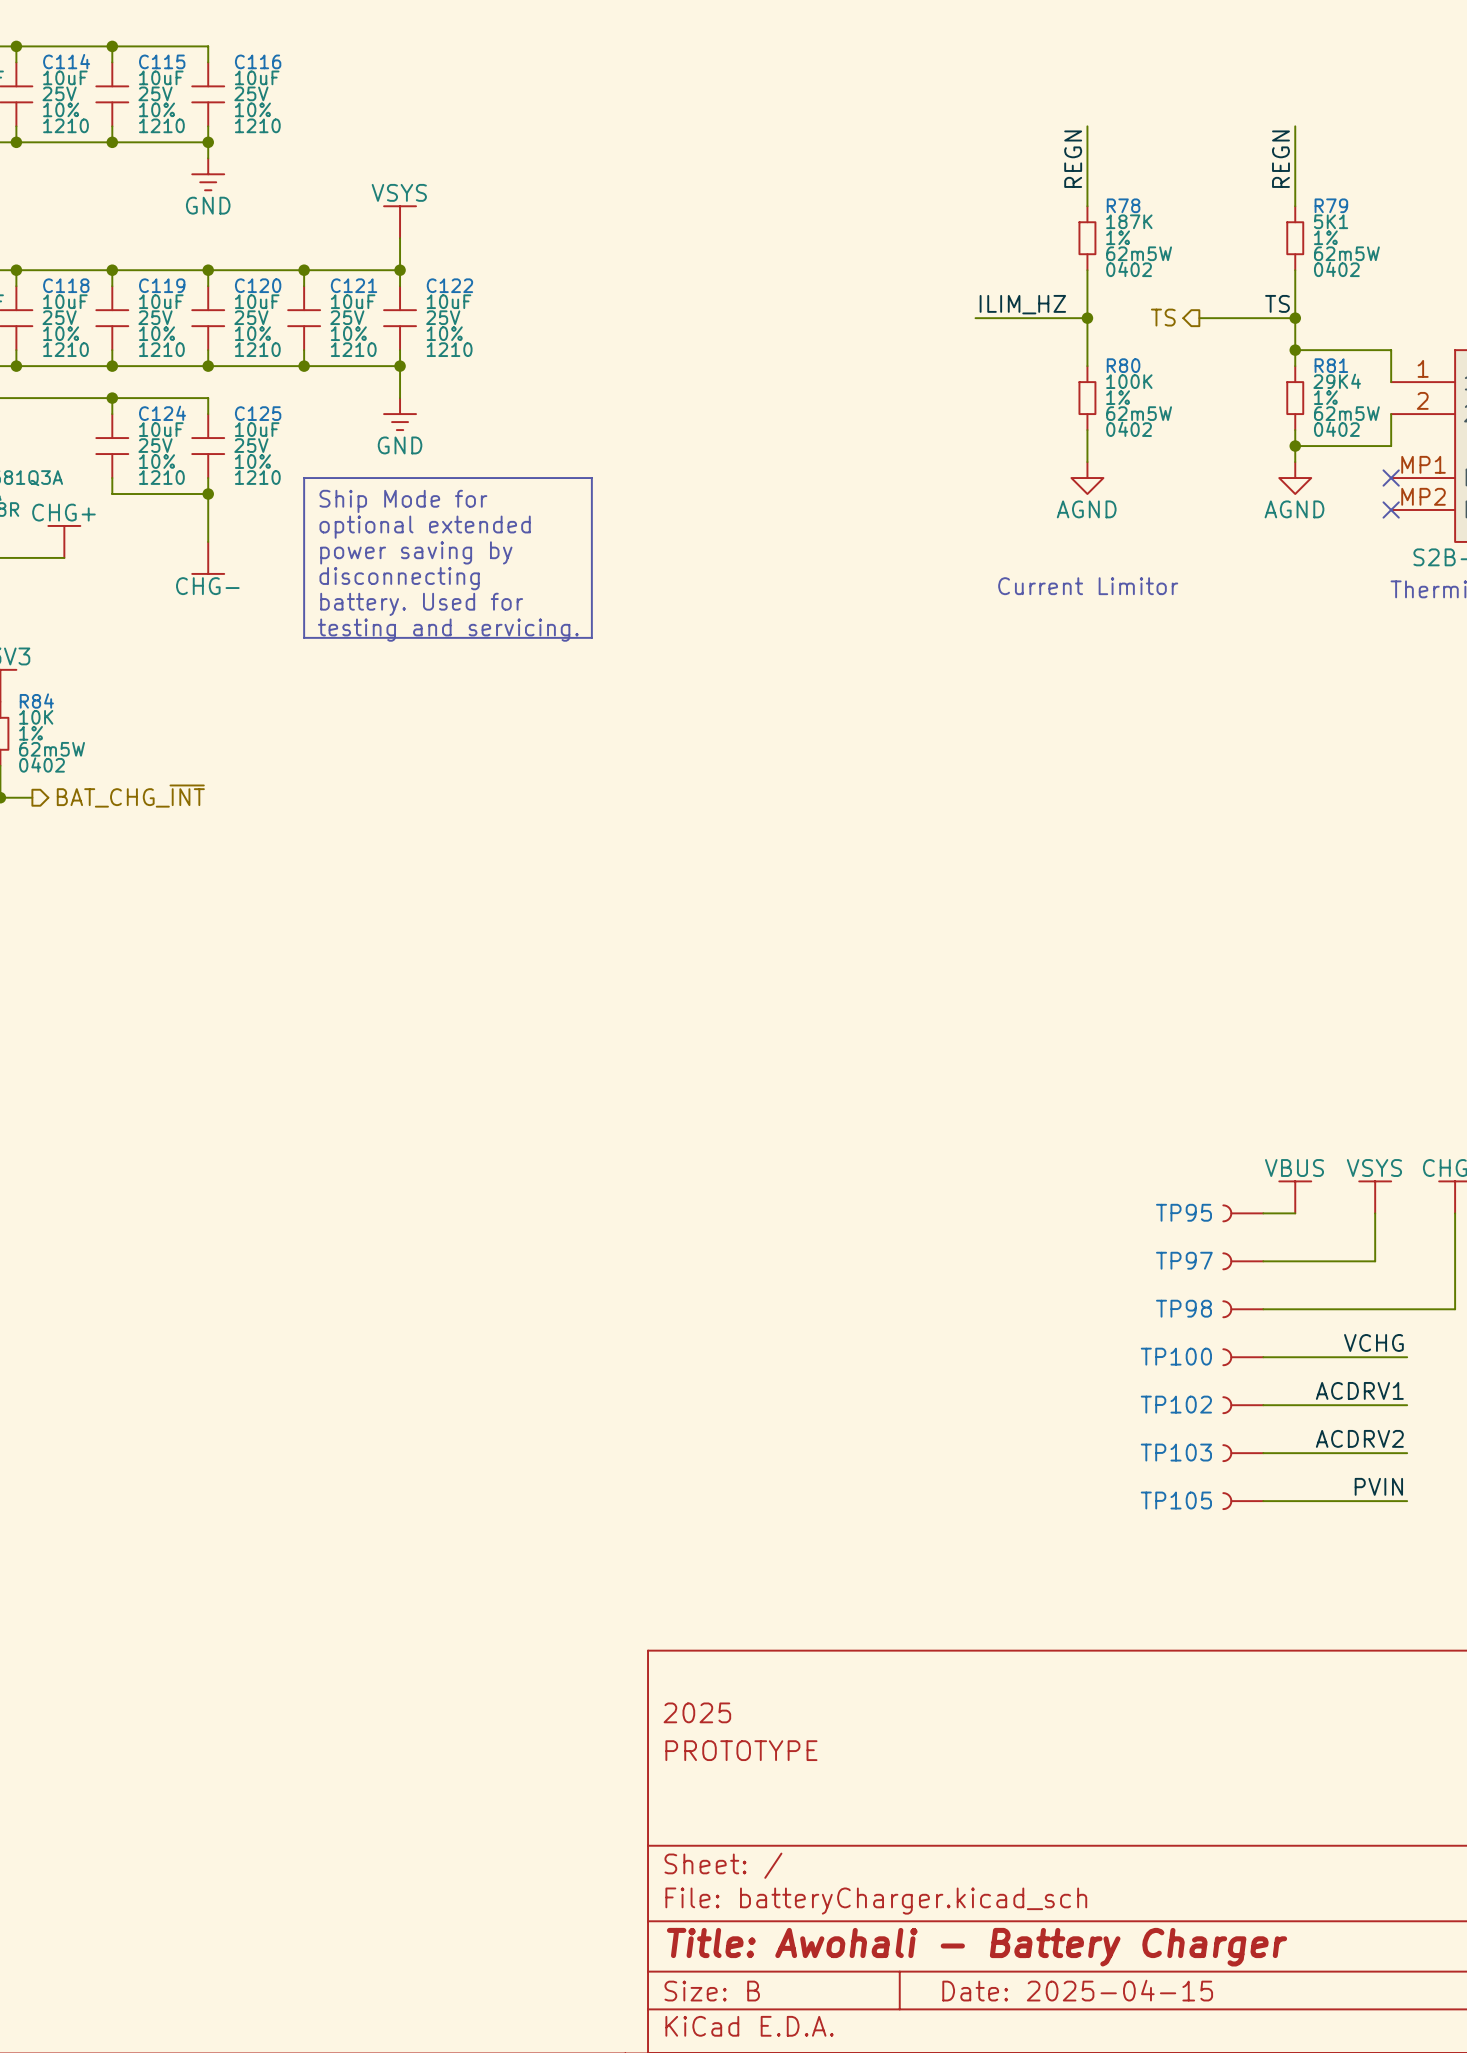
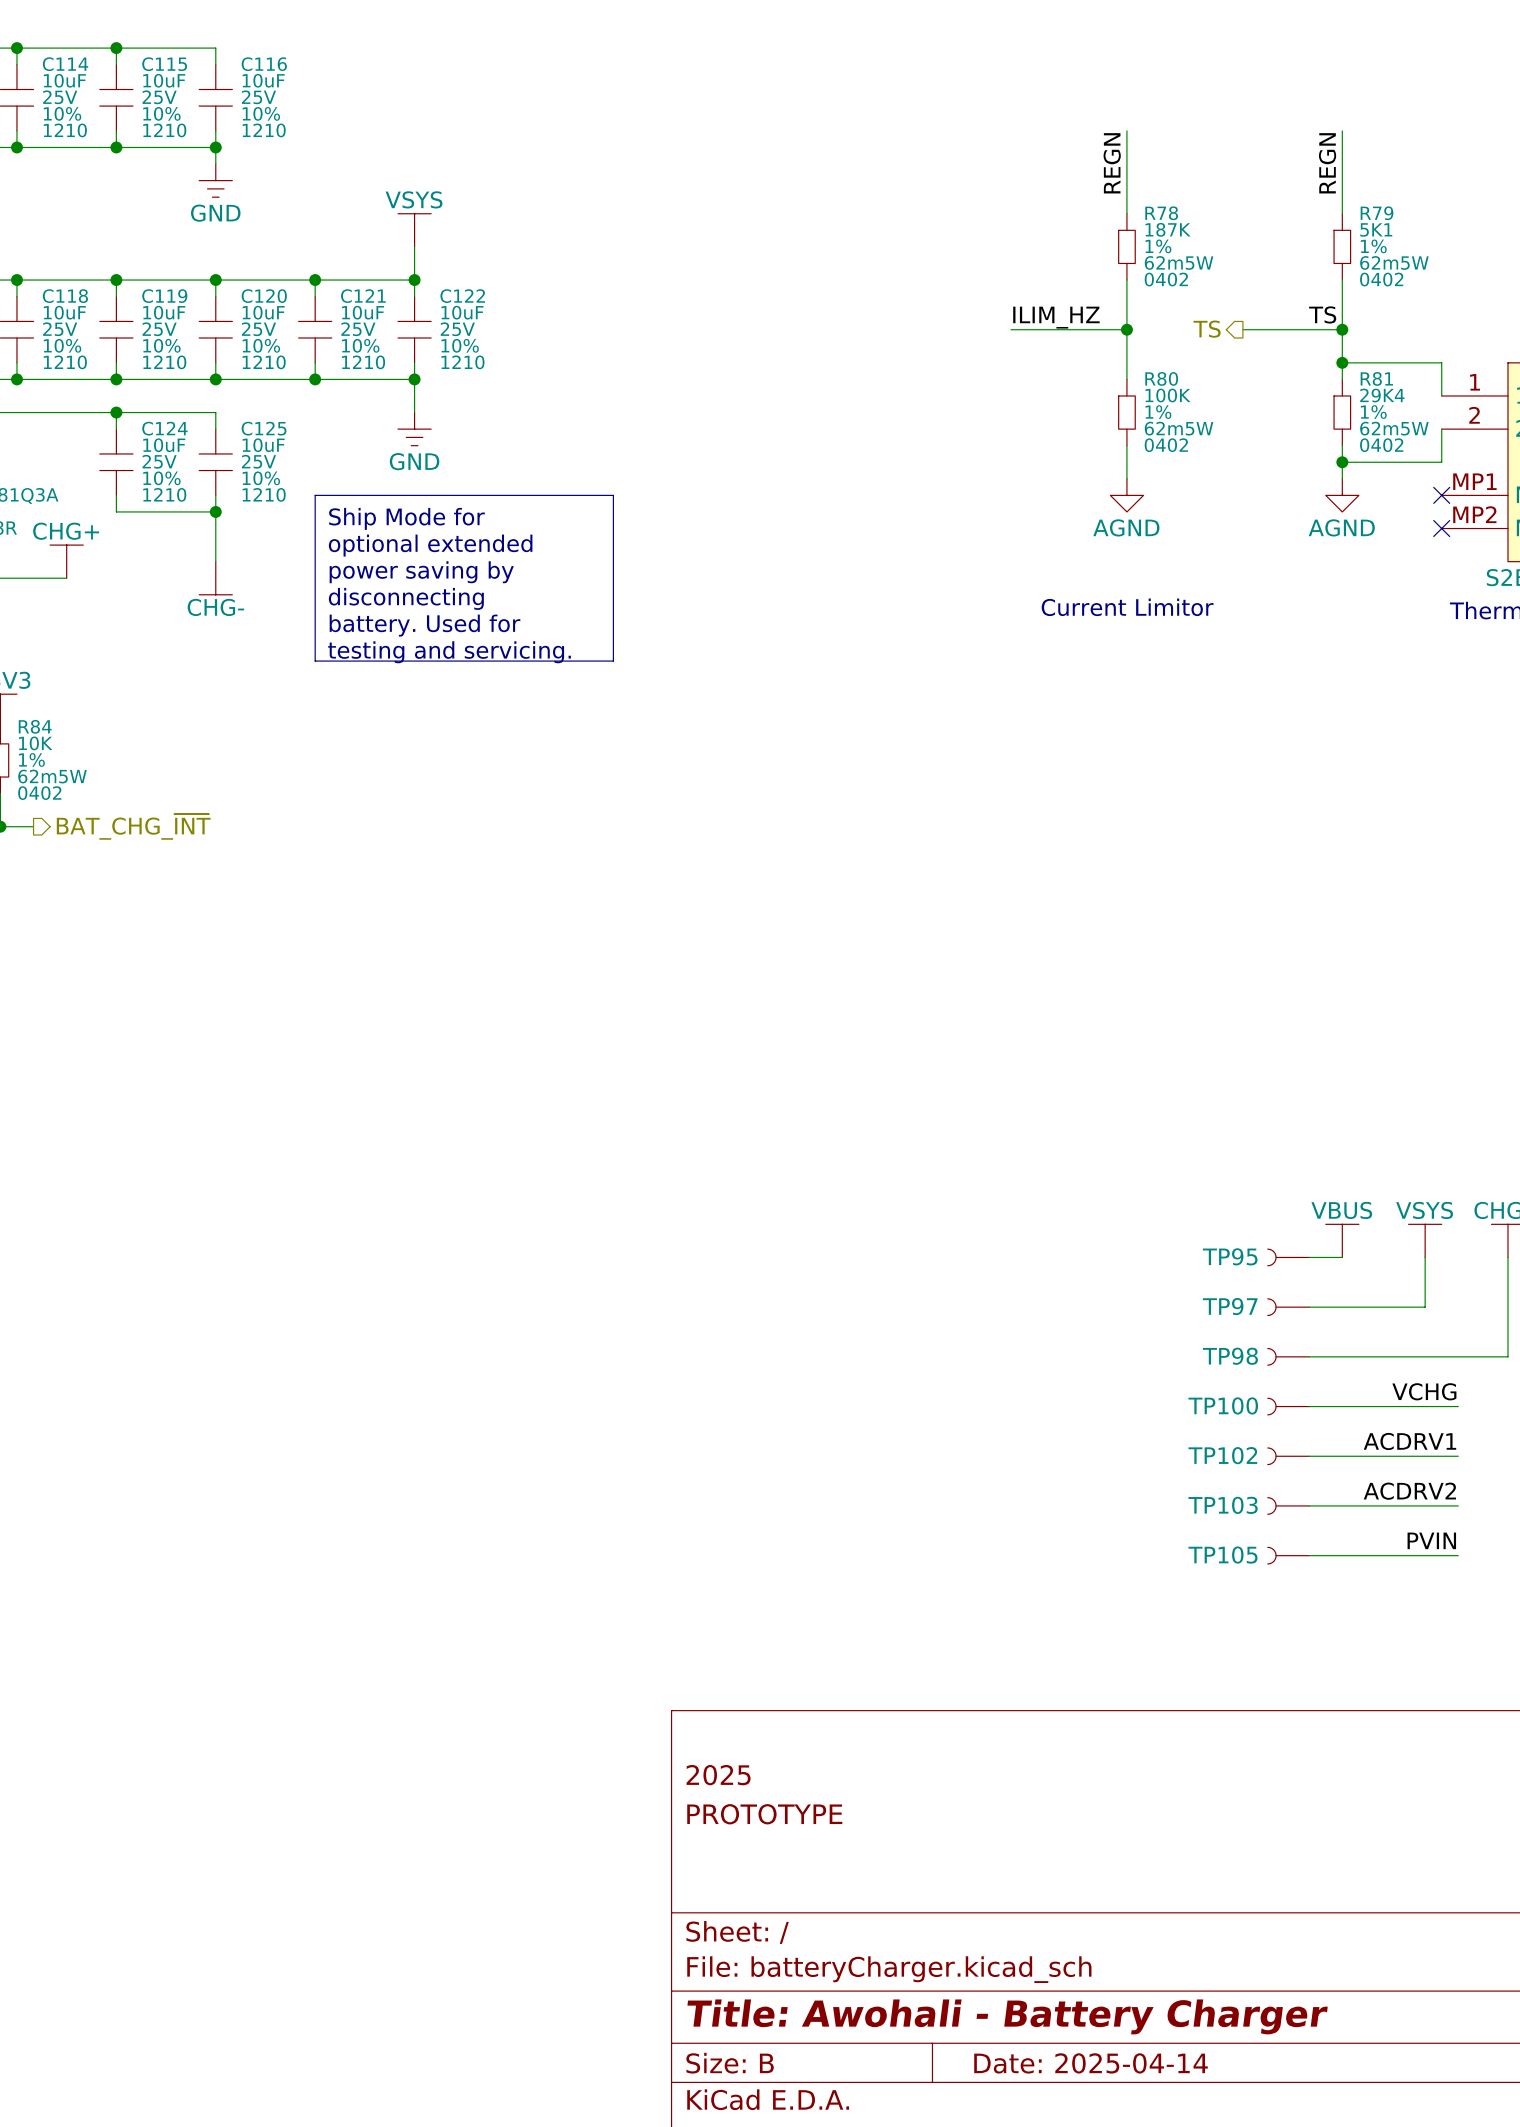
title block: Date: 2025-04-15 (1077, 1990) -> Date: 2025-04-14 (1091, 2063)

